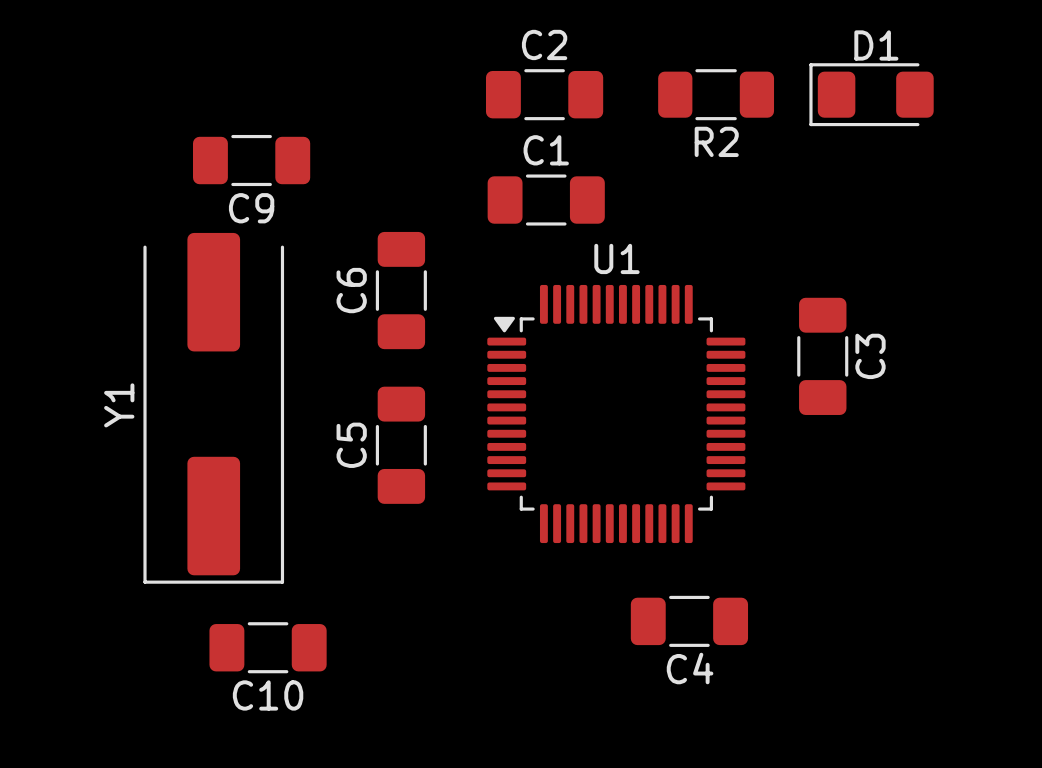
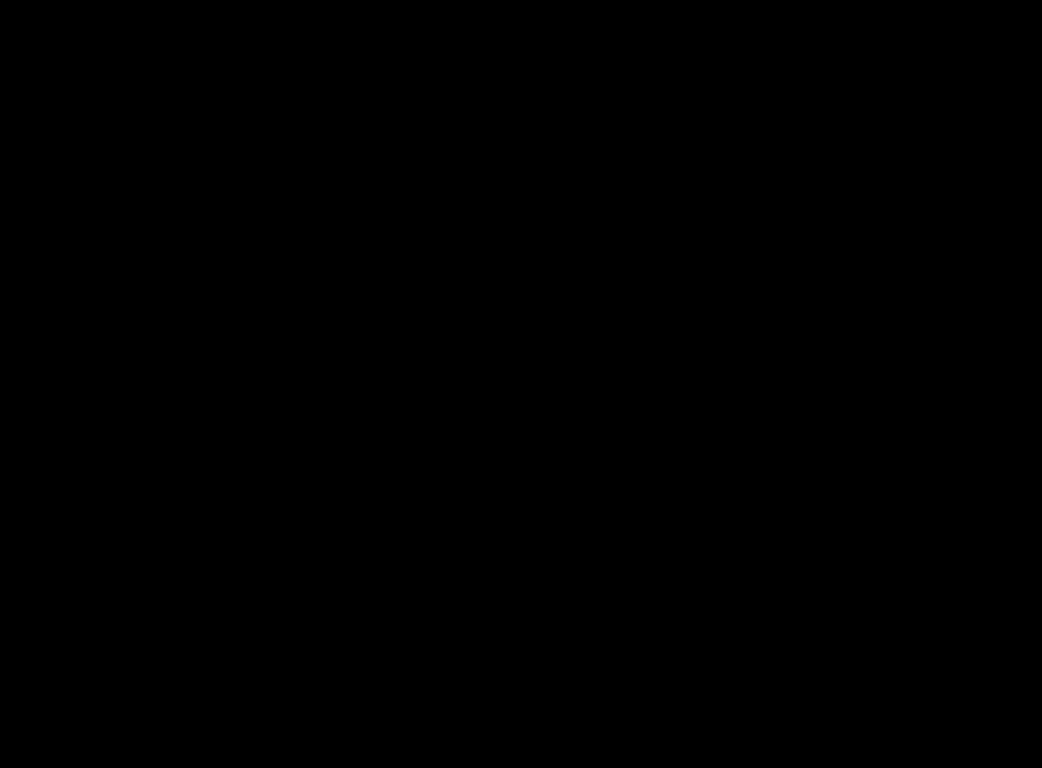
C2: (544, 94) -> none
R2: (716, 94) -> none
D1: (871, 94) -> none
C9: (251, 160) -> none
C1: (546, 200) -> none
C6: (401, 290) -> none
C3: (822, 356) -> none
Y1: (213, 408) -> none
U1: (616, 414) -> none
C5: (401, 445) -> none
C4: (689, 621) -> none
C10: (268, 647) -> none

